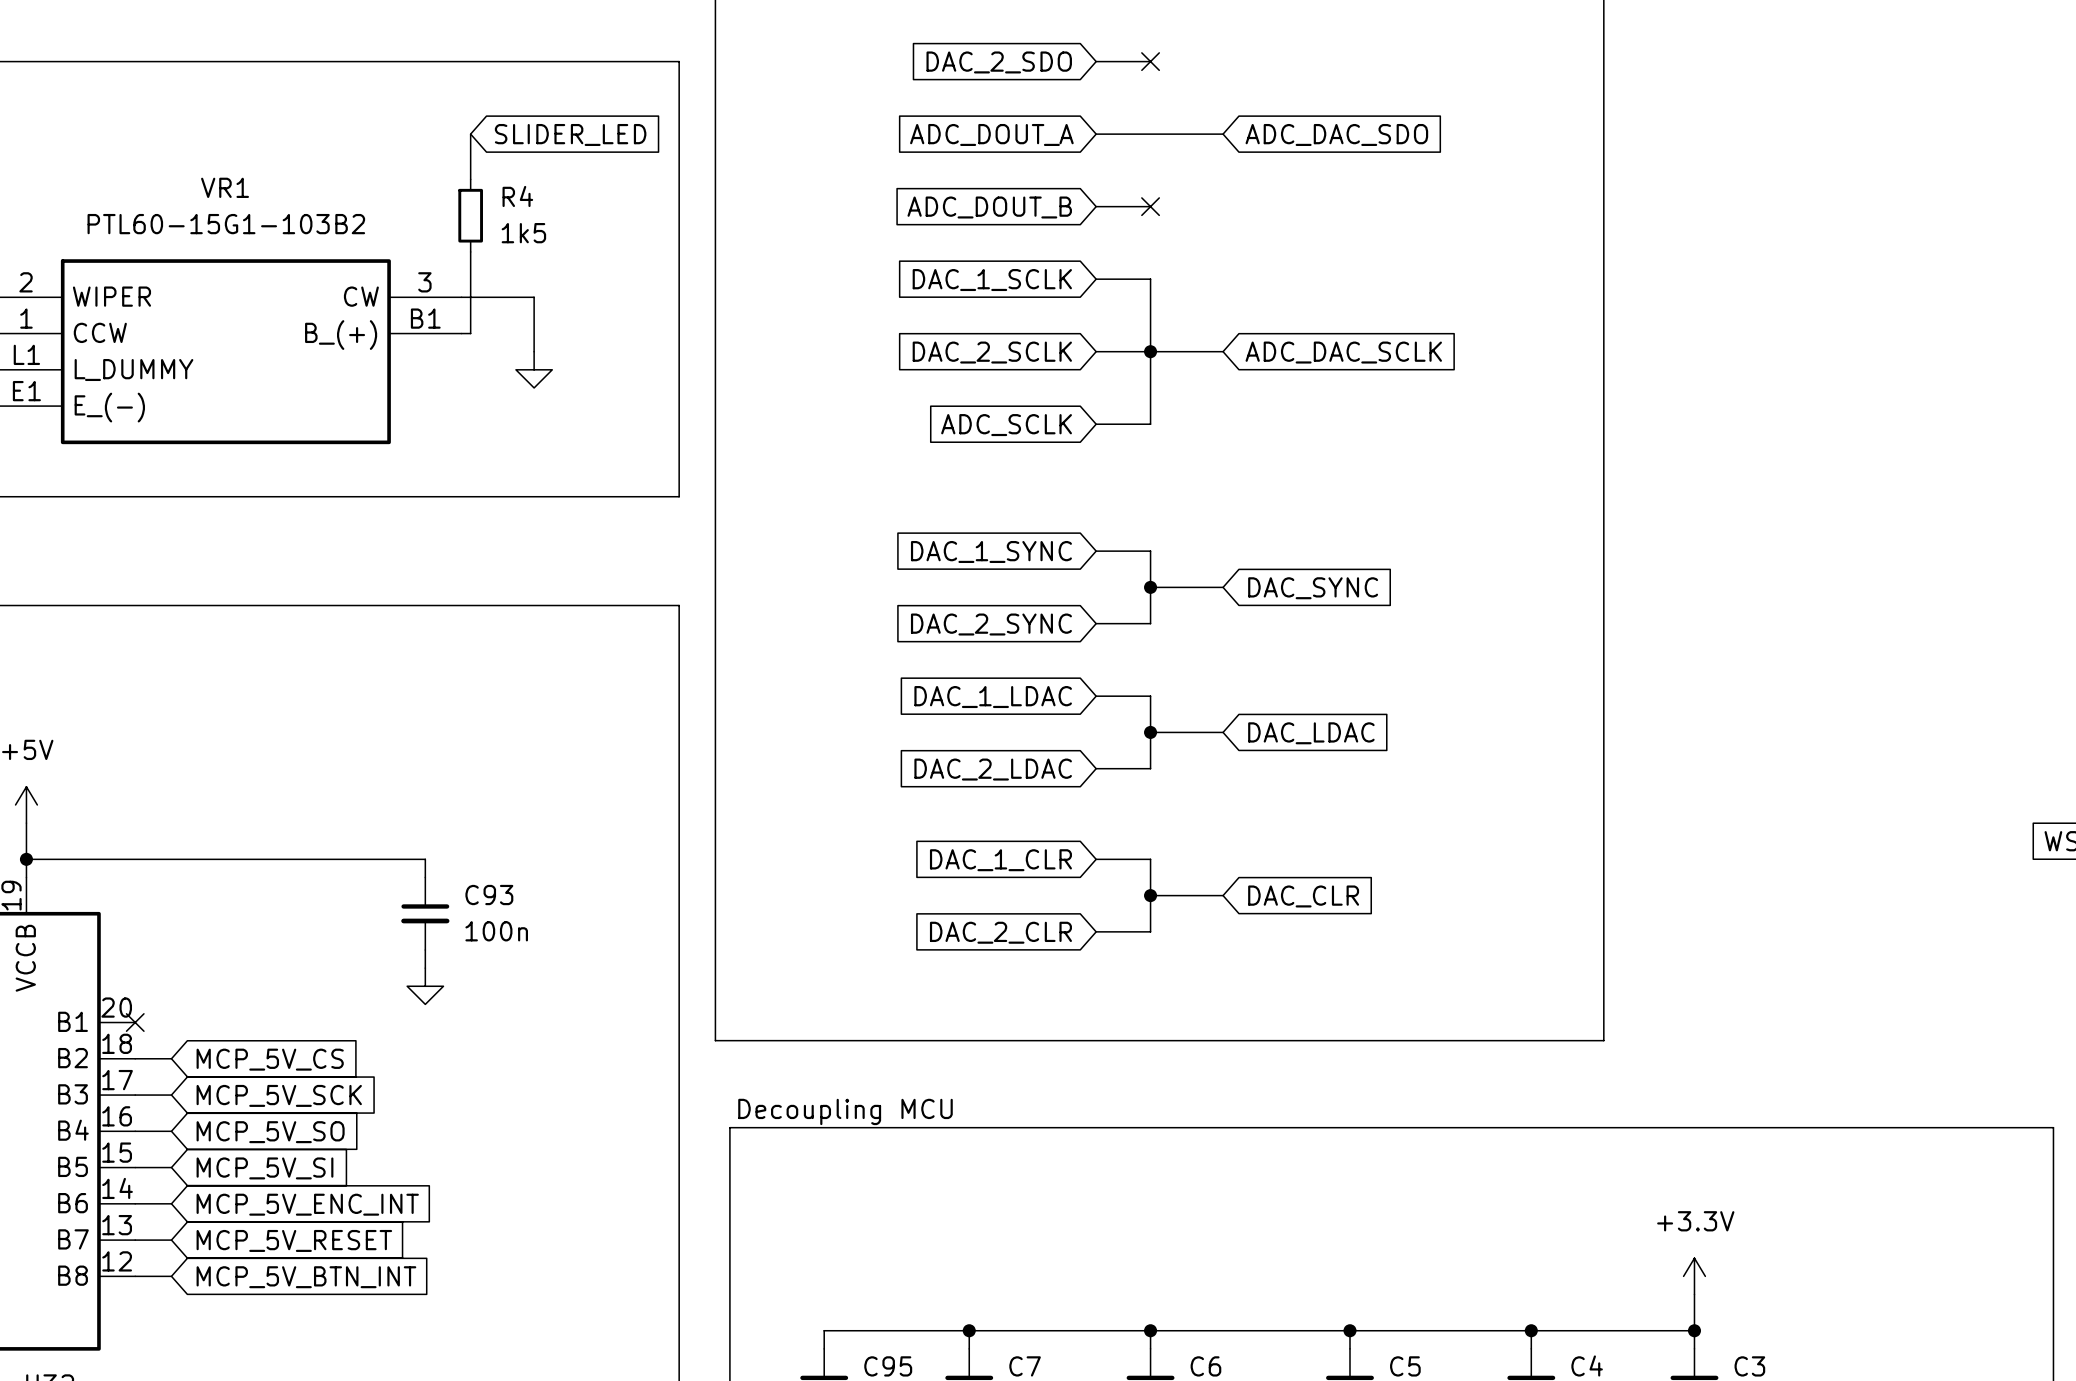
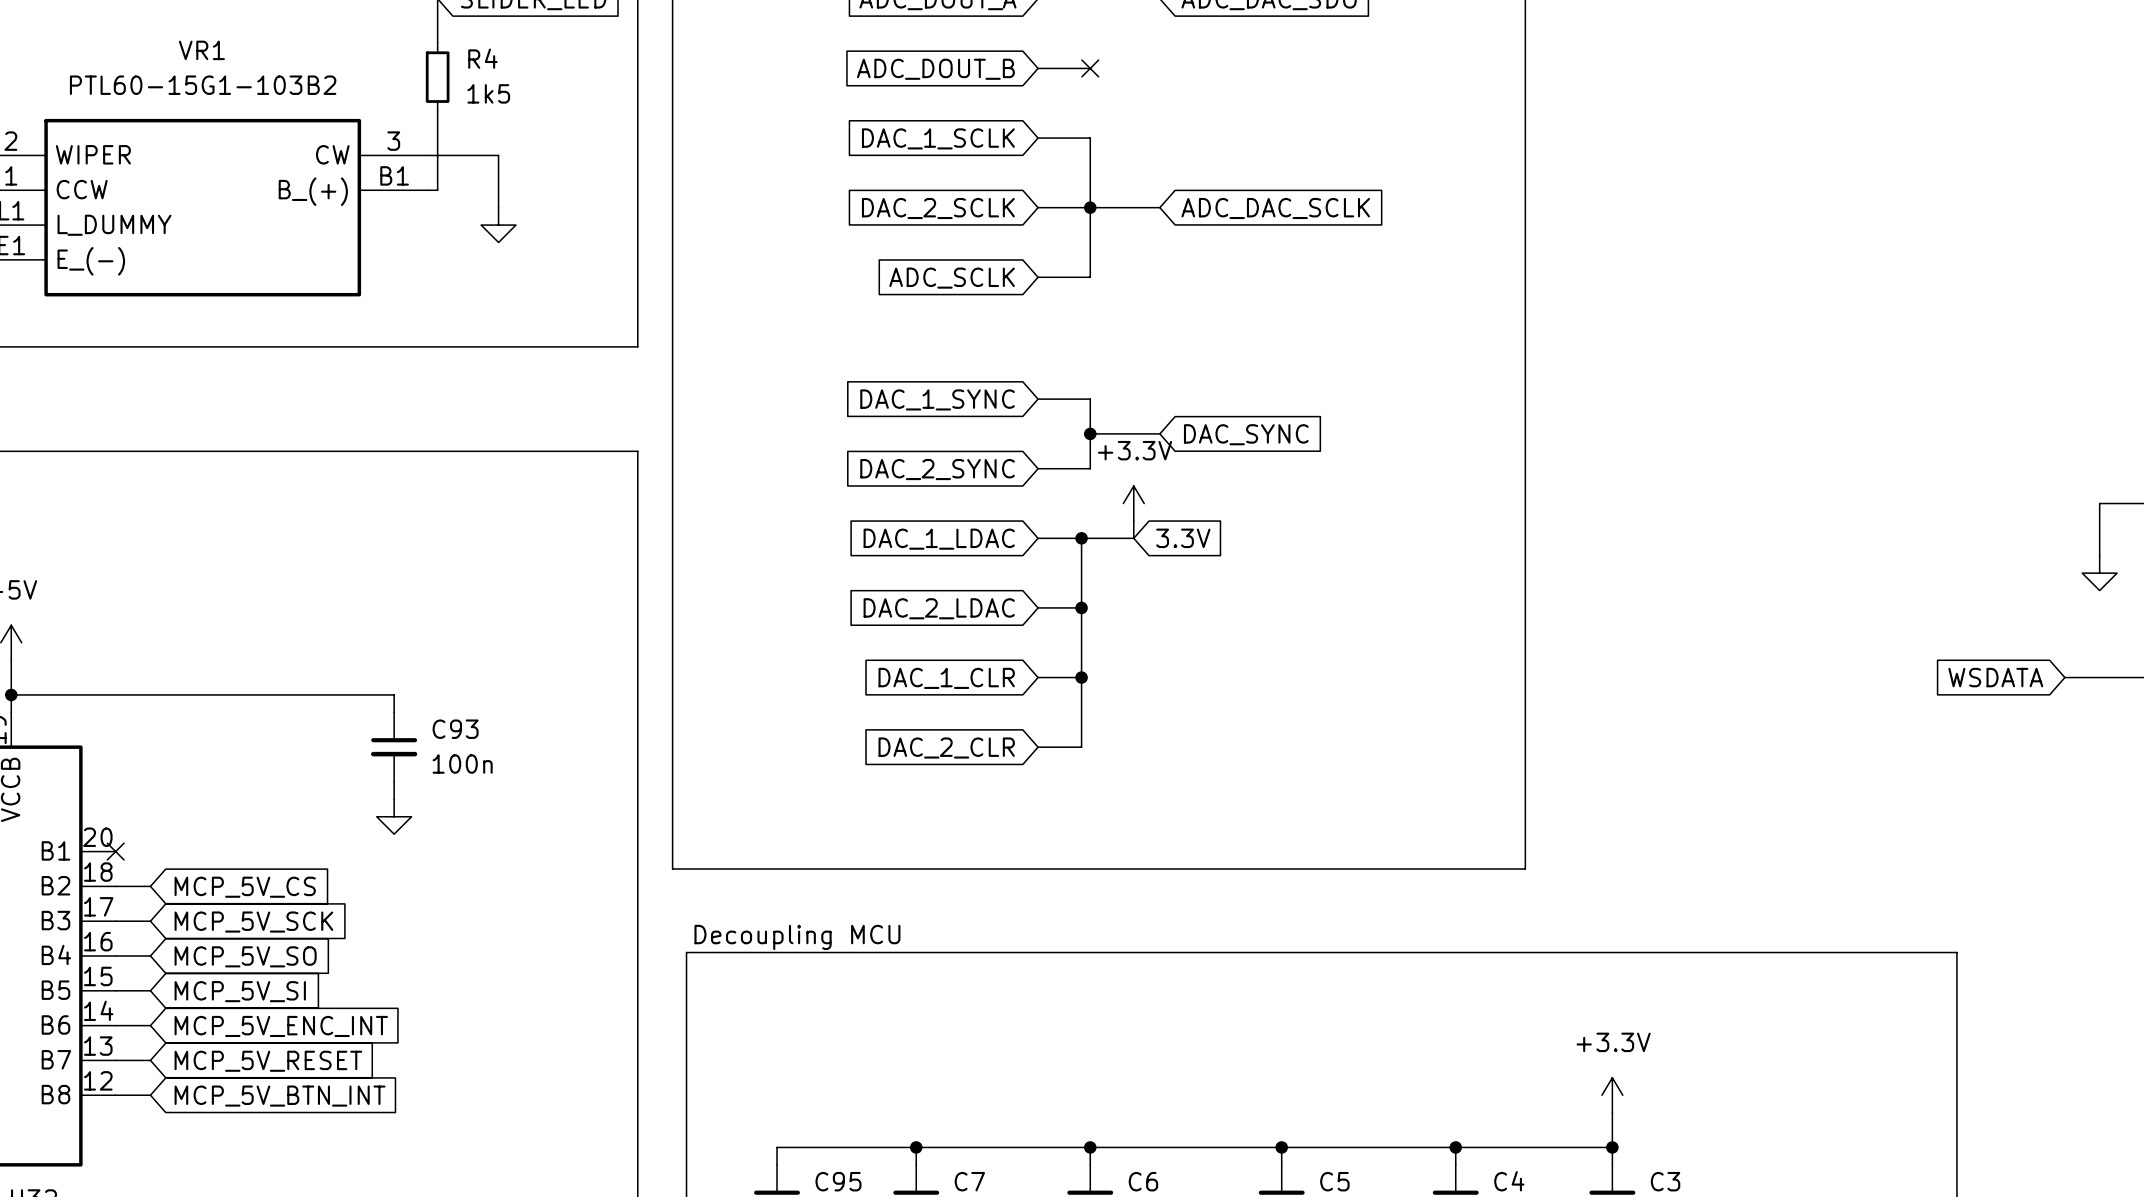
power symbol: none -> +3.3V (1133, 503)
wire: none -> (1081, 538) (1081, 747) (1038, 747)
junction: none -> (1081, 538)
wire: (1150, 696) (1150, 768) (1141, 768) -> (1090, 538) (1133, 538) (1133, 520)
global label: none -> 3.3V (1183, 538)
wire: (1150, 732) (1223, 732) -> none
junction: (1150, 732) -> none
global label: DAC_LDAC (1311, 733) -> none
junction: none -> (1081, 607)
wire: none -> (1038, 677) (1081, 677)
junction: none -> (1081, 677)
wire: (1096, 859) (1150, 859) (1150, 931) (1096, 931) -> none
global label position: DAC_1_CLR (1000, 860) -> DAC_1_CLR (946, 678)
wire: (1150, 895) (1223, 895) -> none
junction: (1150, 895) -> none
global label: DAC_CLR (1303, 896) -> none
global label position: DAC_2_CLR (1000, 932) -> DAC_2_CLR (946, 748)

